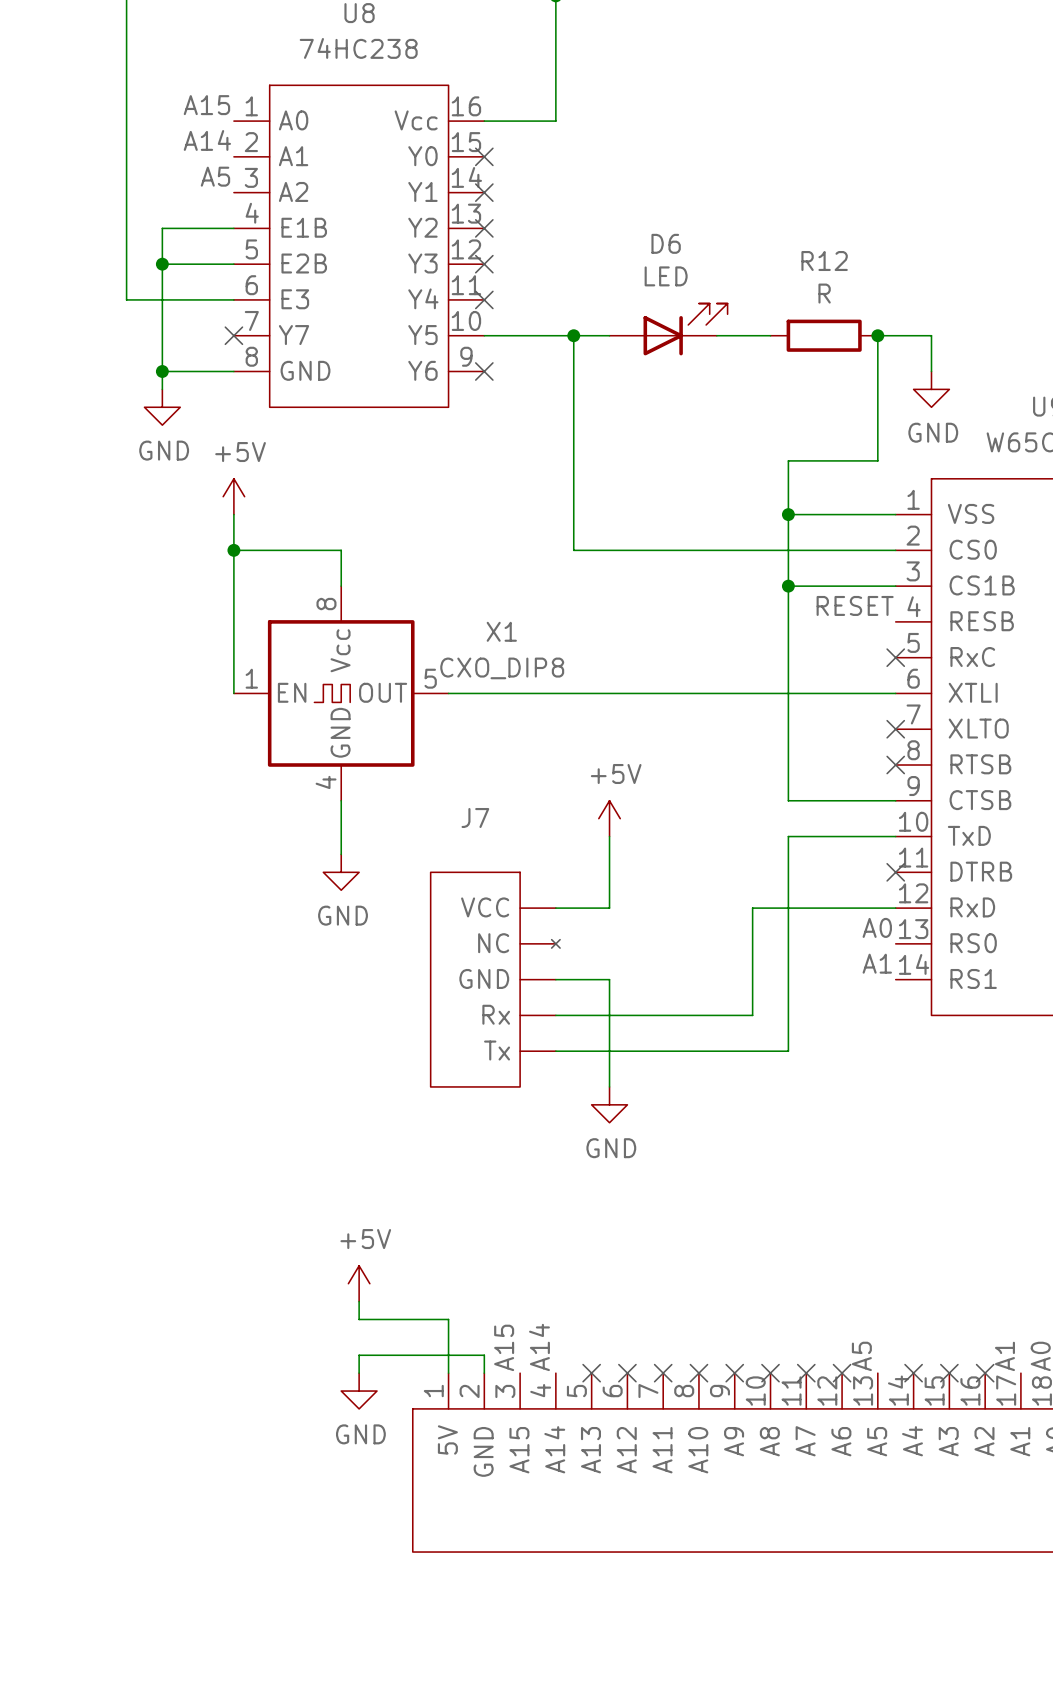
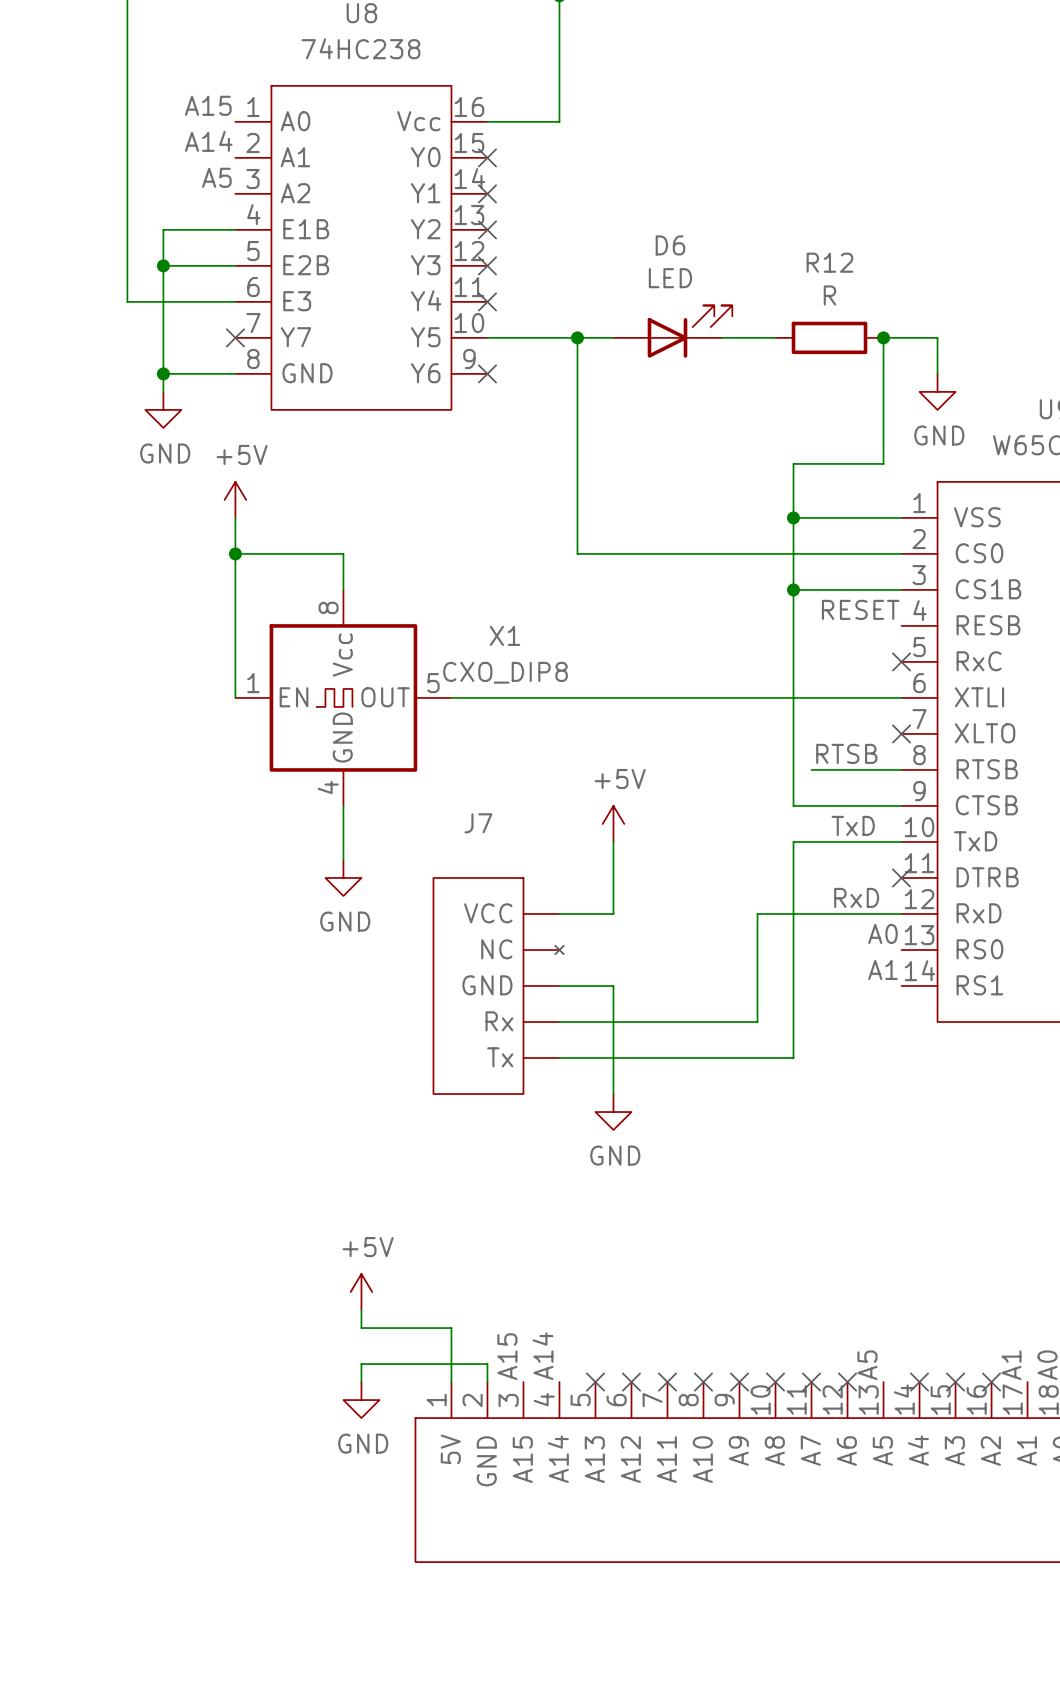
label: none -> RTSB (846, 753)
wire: none -> (811, 769) (901, 769)
no-connect mark: (895, 765) -> none
label: none -> TxD (853, 825)
label: none -> RxD (856, 897)

